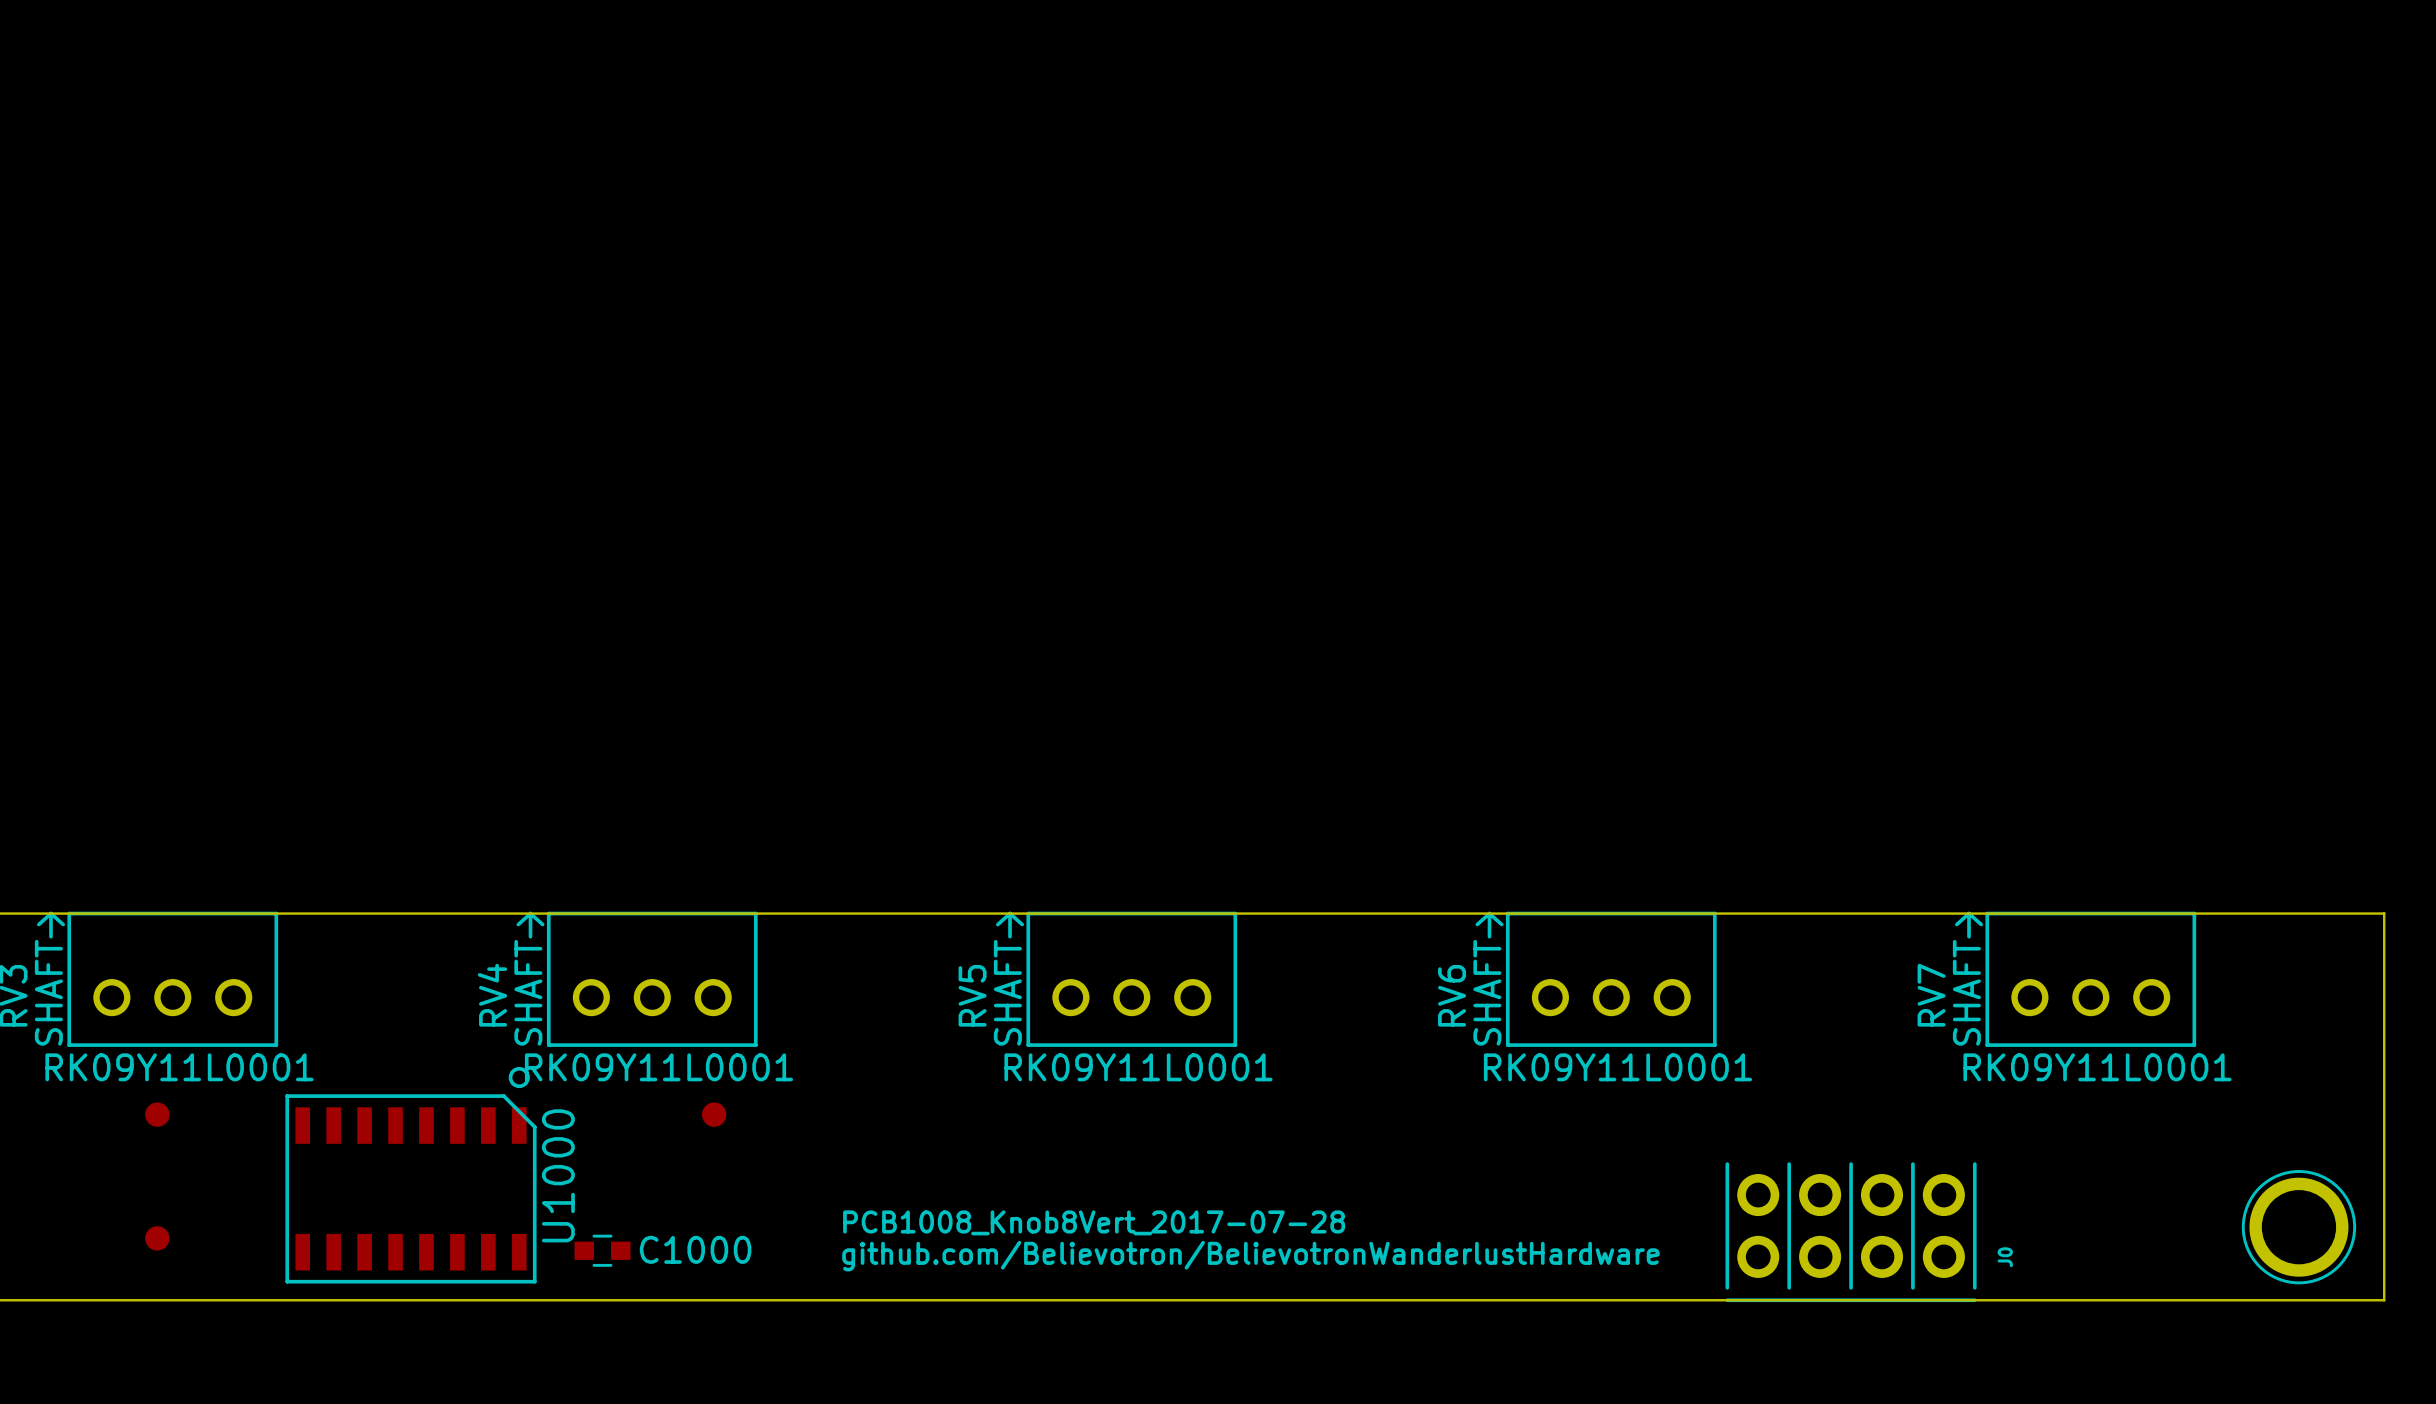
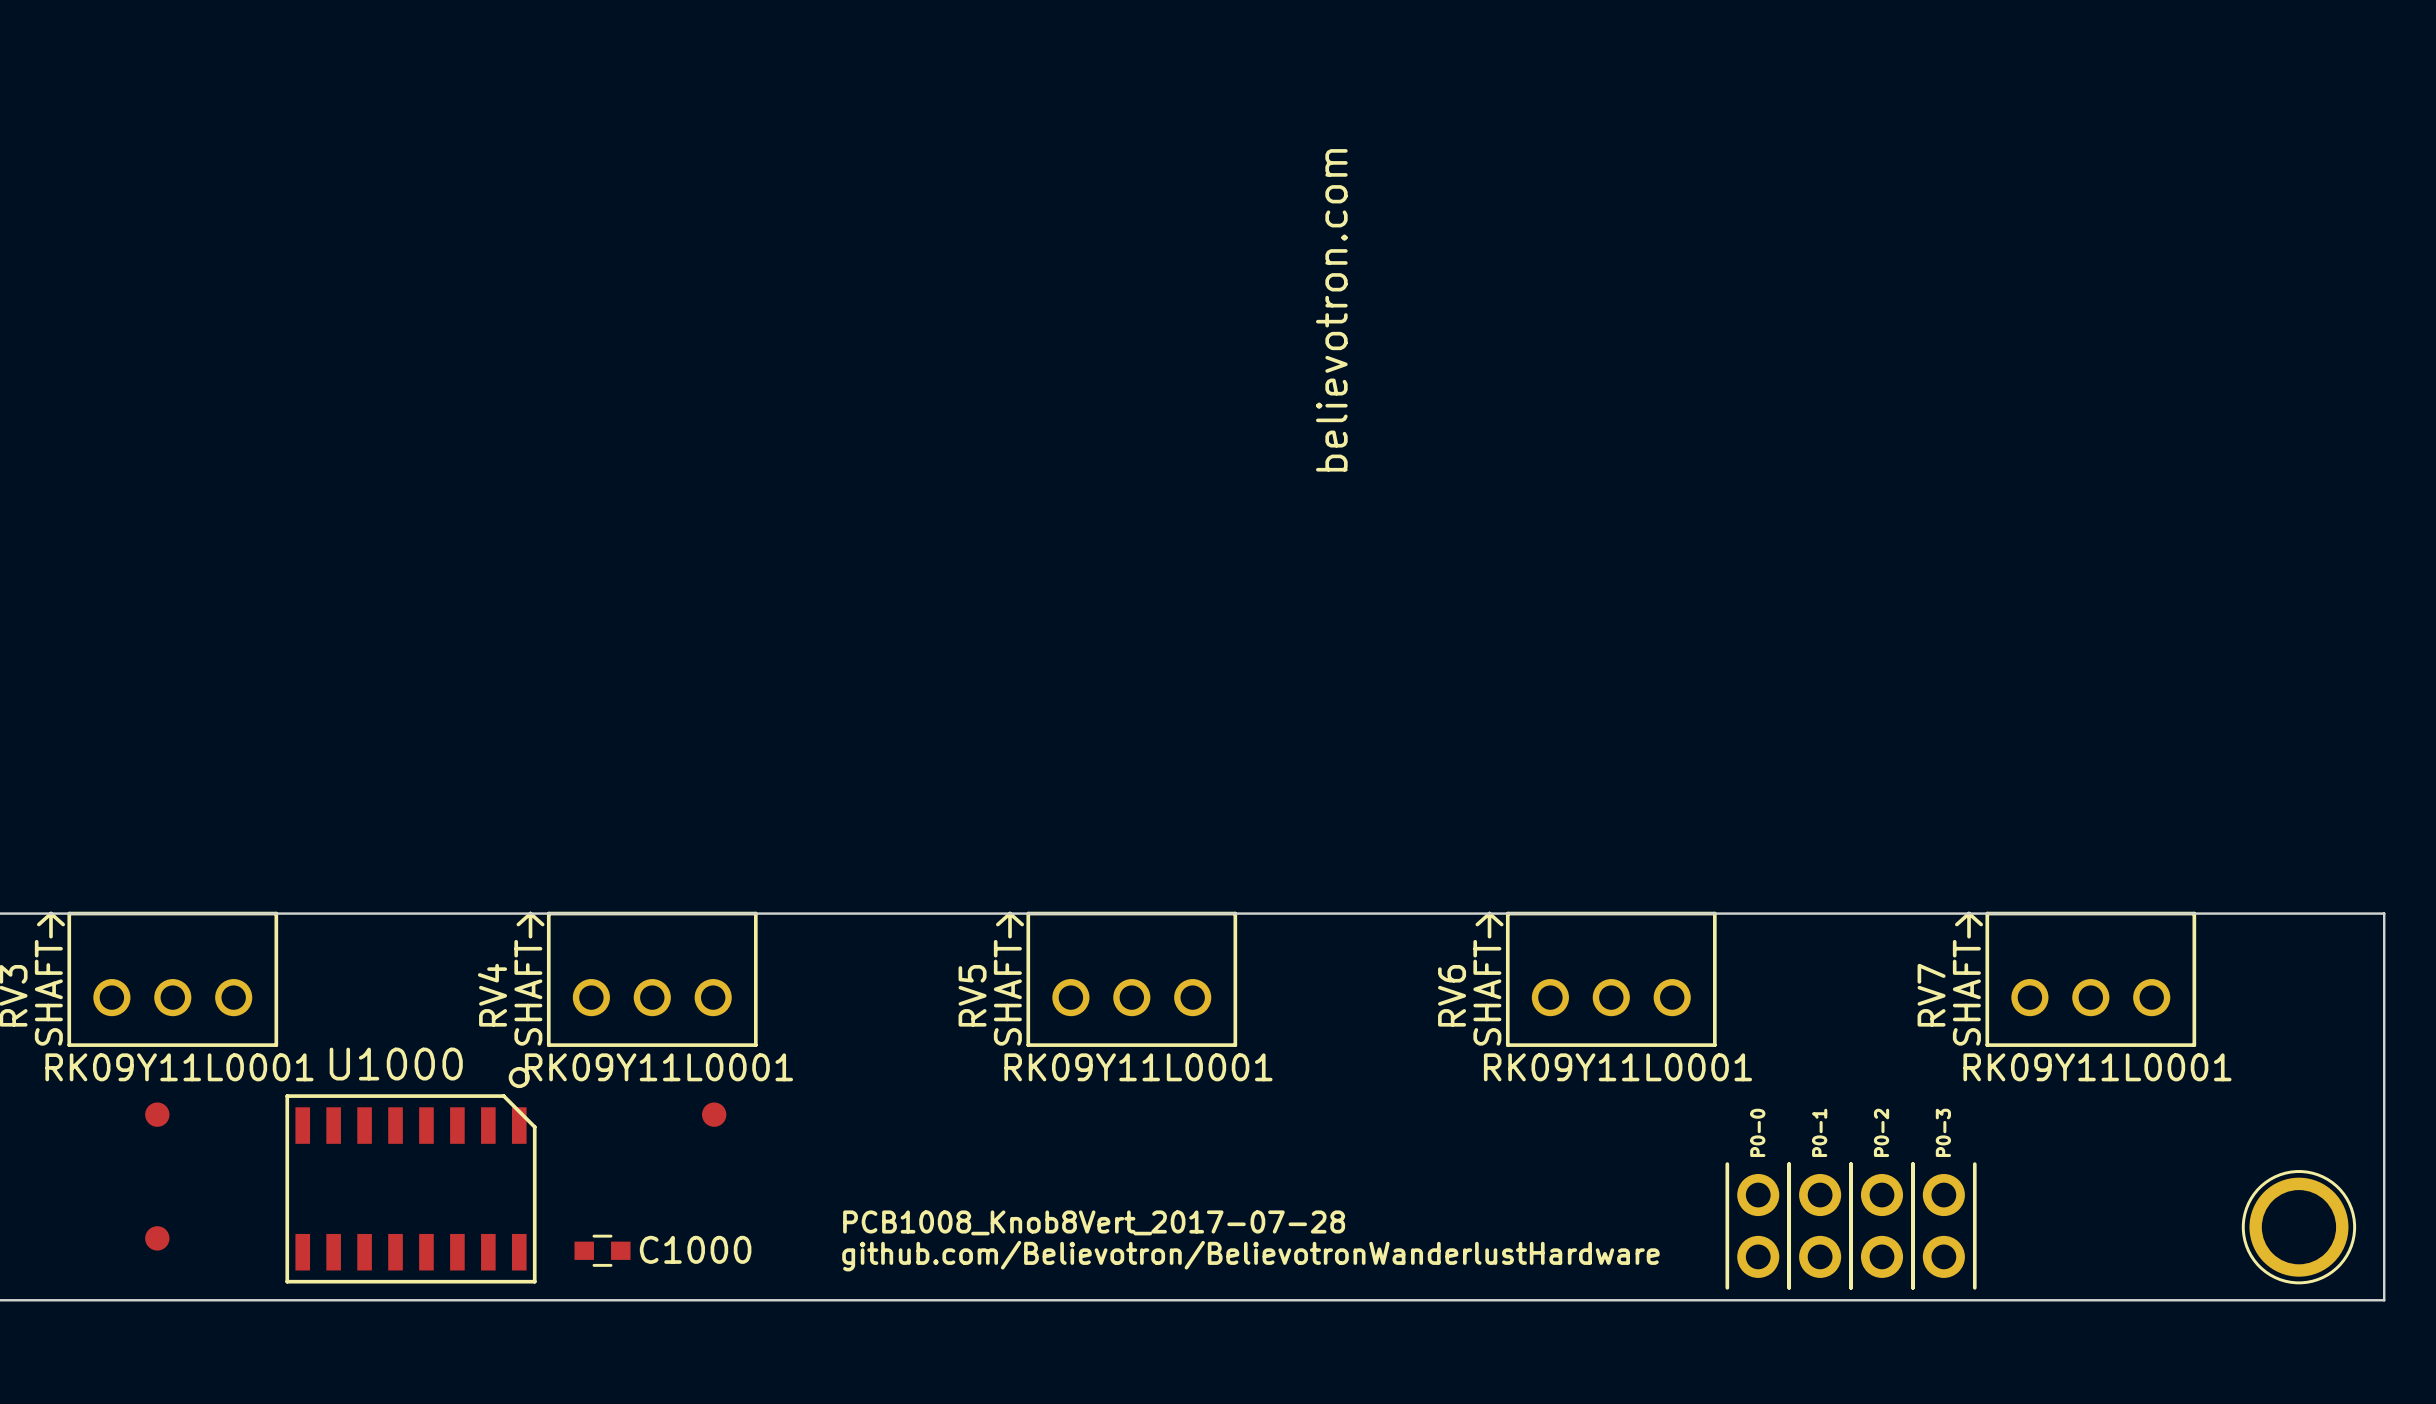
text: none -> believotron.com (1331, 310)
U1000 name rotation: 0° (558, 1175) -> 90° clockwise (396, 1064)
U1000 name position: U1000 (558, 1175) -> U1000 (396, 1064)
P0-0: none -> (1758, 1225)
P0-1: none -> (1820, 1225)
P0-2: none -> (1881, 1225)
P0-3: none -> (1943, 1225)
J0: (1851, 1232) -> none

